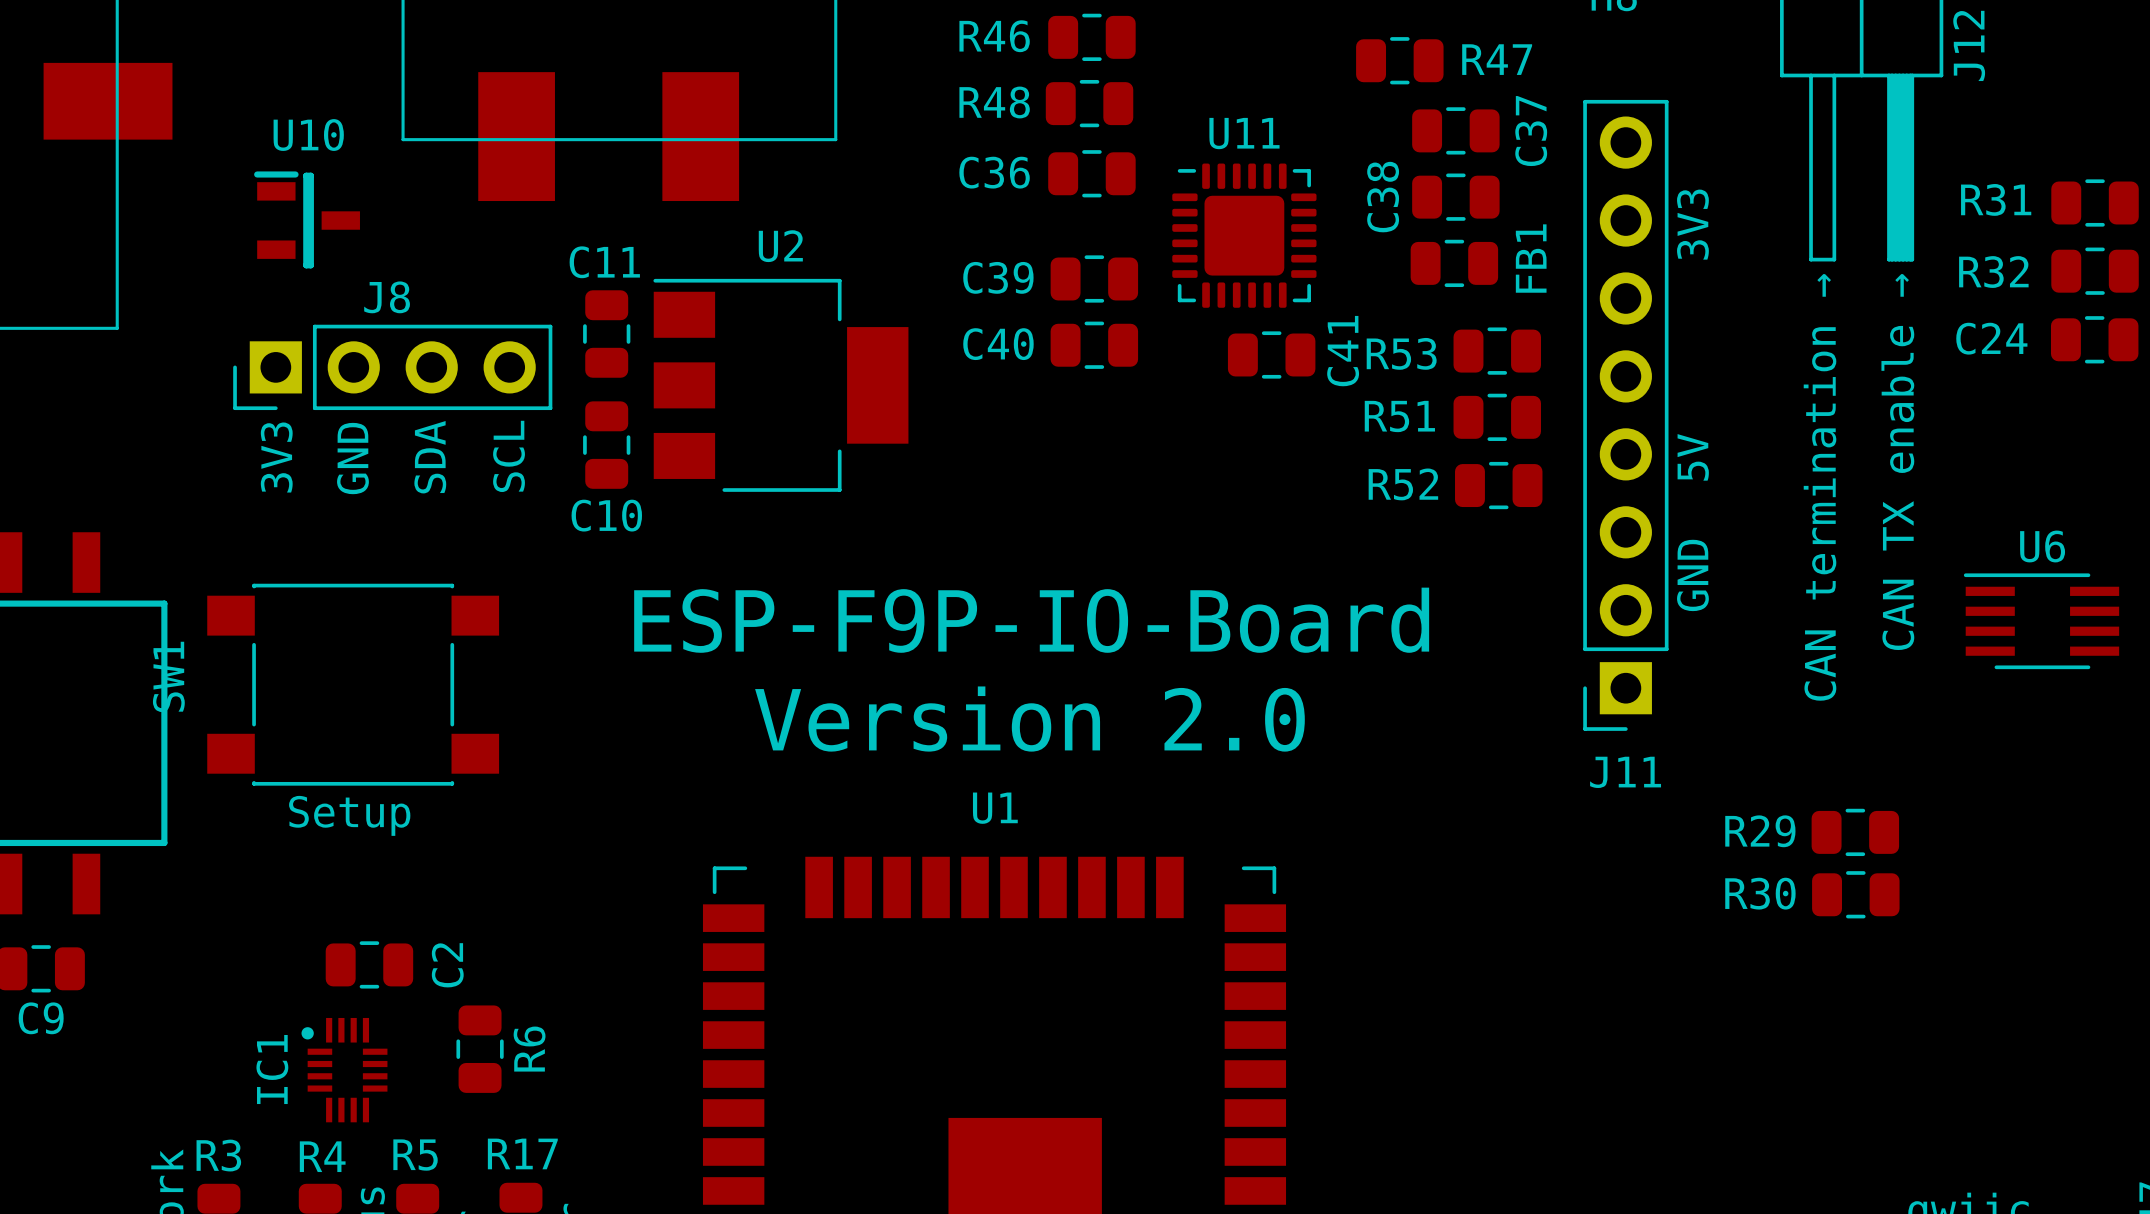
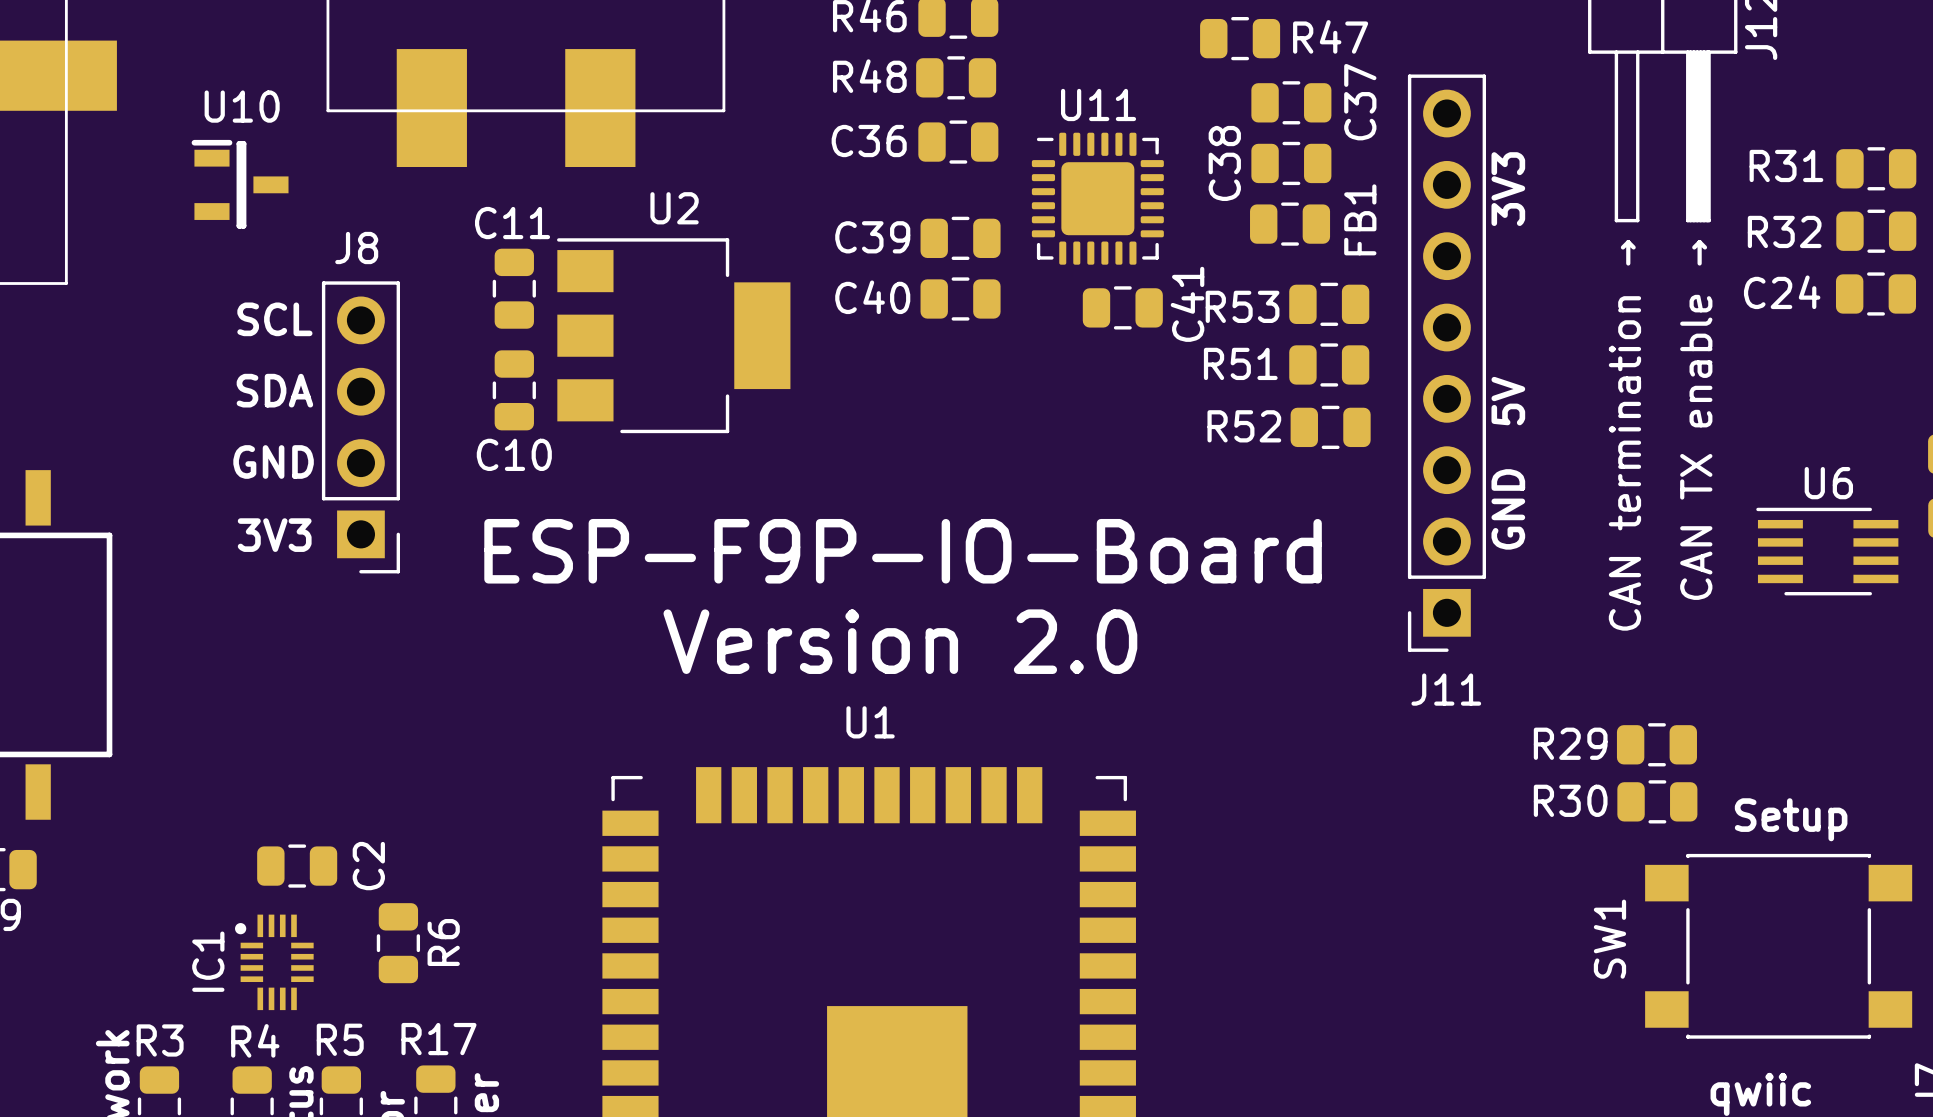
J8 name position: J8 (387, 297) -> J8 (356, 248)
J8 rotation: 0° (392, 367) -> 90° counterclockwise (360, 427)
text rotation: 0° (509, 456) -> 90° clockwise (274, 319)
text position: SCL (509, 456) -> SCL (274, 319)
text rotation: 0° (276, 457) -> 90° clockwise (274, 535)
text position: 3V3 (276, 457) -> 3V3 (274, 535)
text rotation: 0° (430, 457) -> 90° clockwise (274, 390)
text rotation: 0° (352, 458) -> 90° clockwise (273, 461)
SW1 position: (353, 684) -> (1778, 946)
text: Setup (349, 815) -> none
text: none -> Setup (1791, 819)

